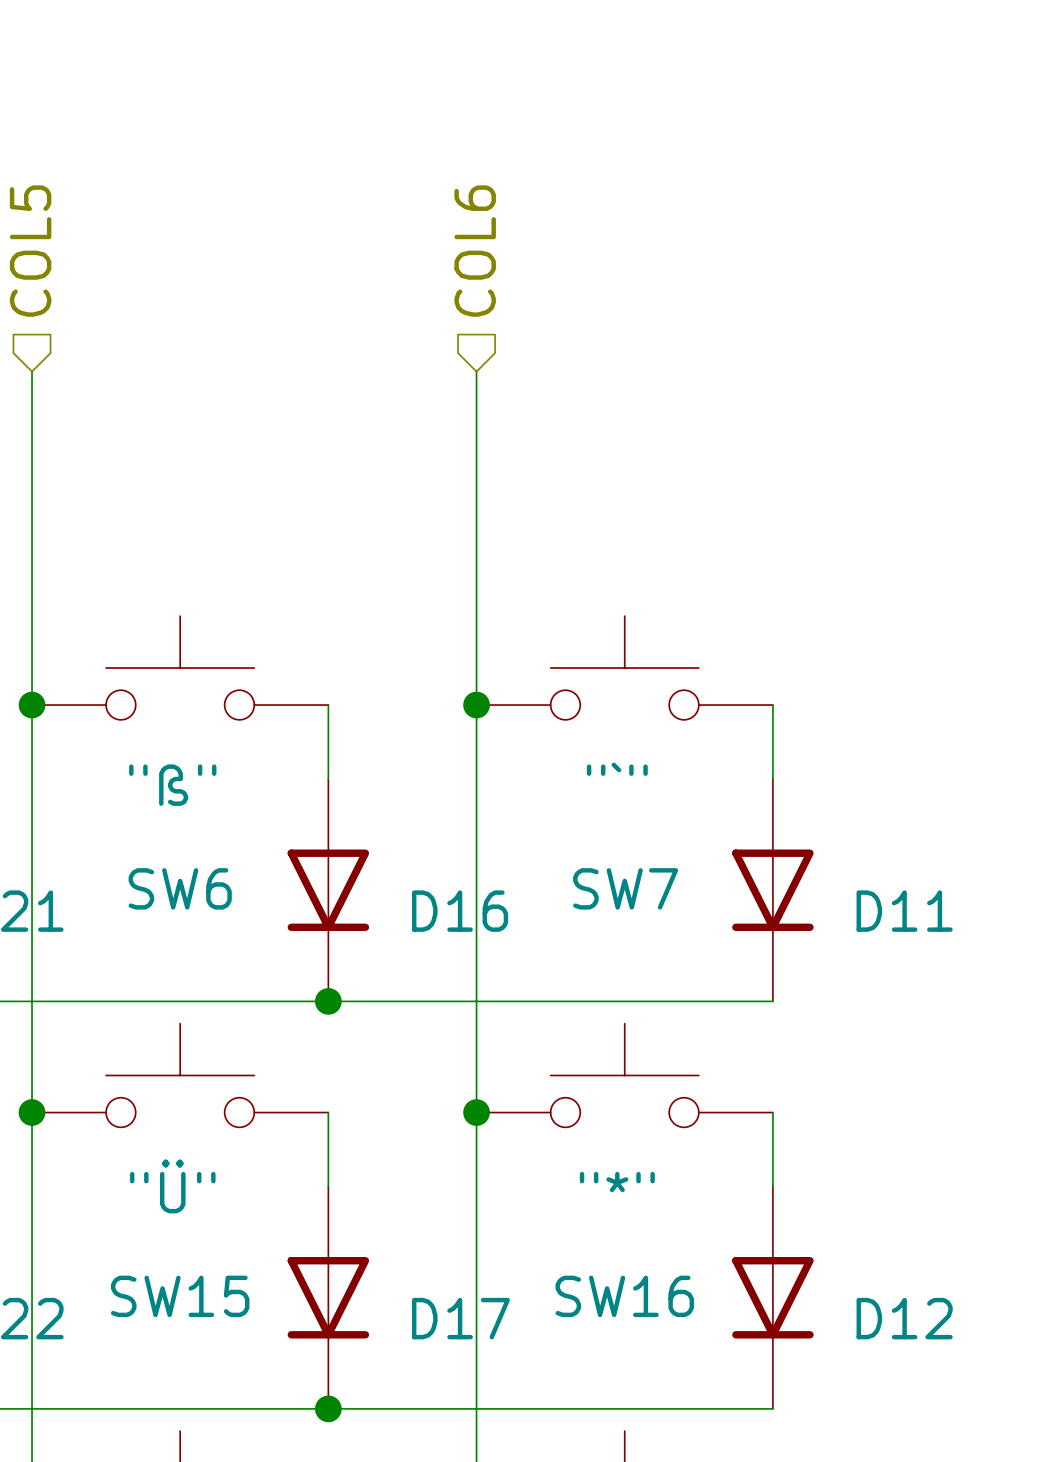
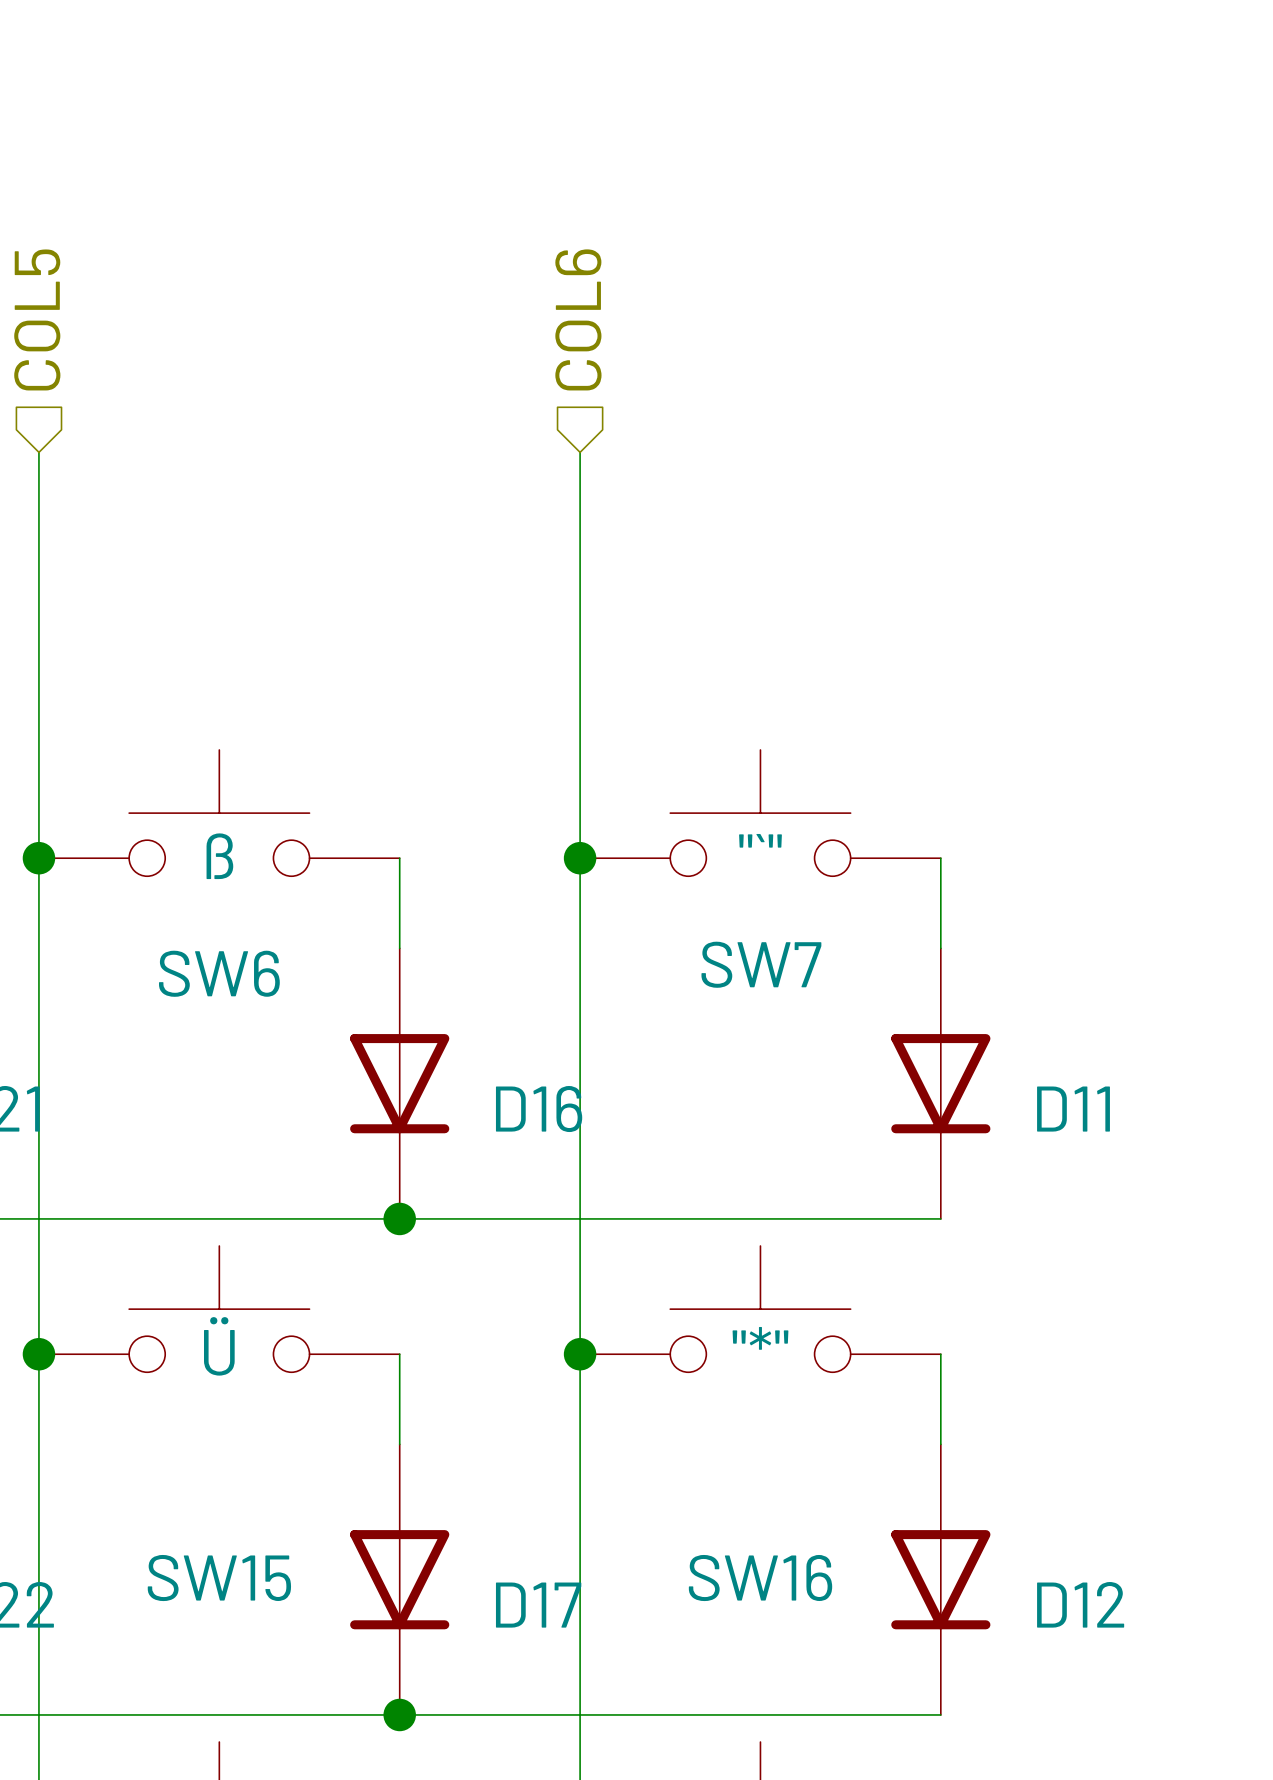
SW7 text: none -> "`" (760, 840)
SW6 text: none -> ß (219, 856)
SW7 value: "`" (617, 769) -> none
SW6 value: "ß" (172, 785) -> none
SW6 name position: SW6 (180, 888) -> SW6 (219, 973)
SW7 name position: SW7 (625, 888) -> SW7 (761, 964)
SW16 text: none -> "*" (760, 1338)
SW15 text: none -> Ü (219, 1346)
SW16 value: "*" (617, 1182) -> none
SW15 value: "Ü" (172, 1186) -> none

